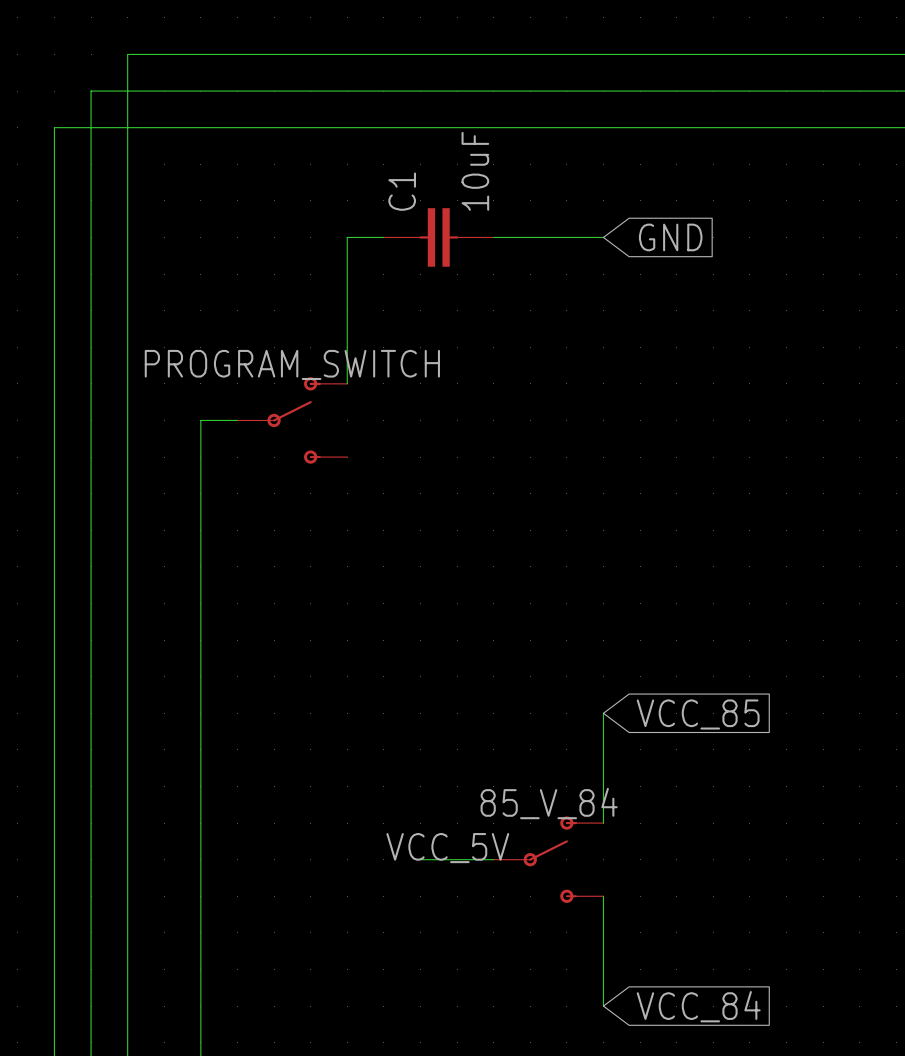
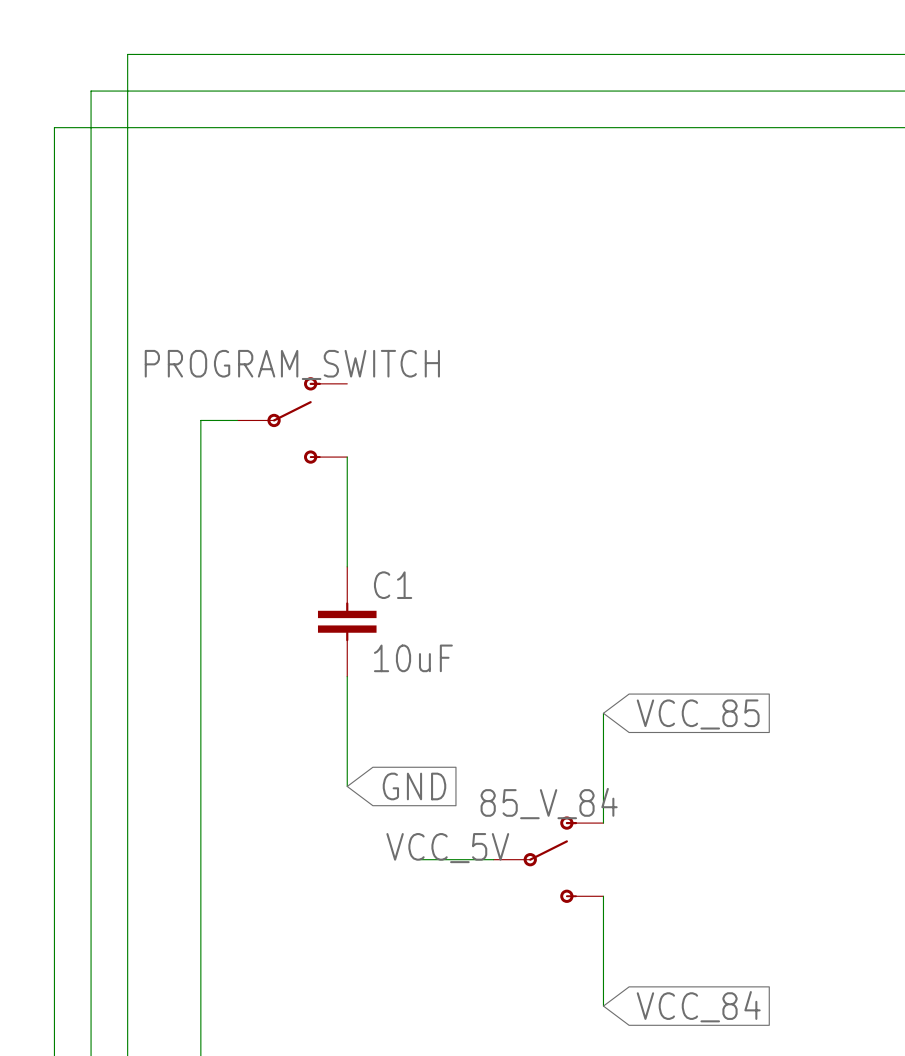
wire: (383, 237) (347, 237) (347, 383) -> none
C1 rotation: 0° (438, 237) -> 90° clockwise (347, 621)
C1 position: (438, 237) -> (347, 621)
wire: (493, 237) (603, 237) -> none
global label: GND (670, 237) -> none
wire: none -> (347, 457) (347, 566)
wire: none -> (347, 676) (347, 786)
global label: none -> GND (414, 786)

